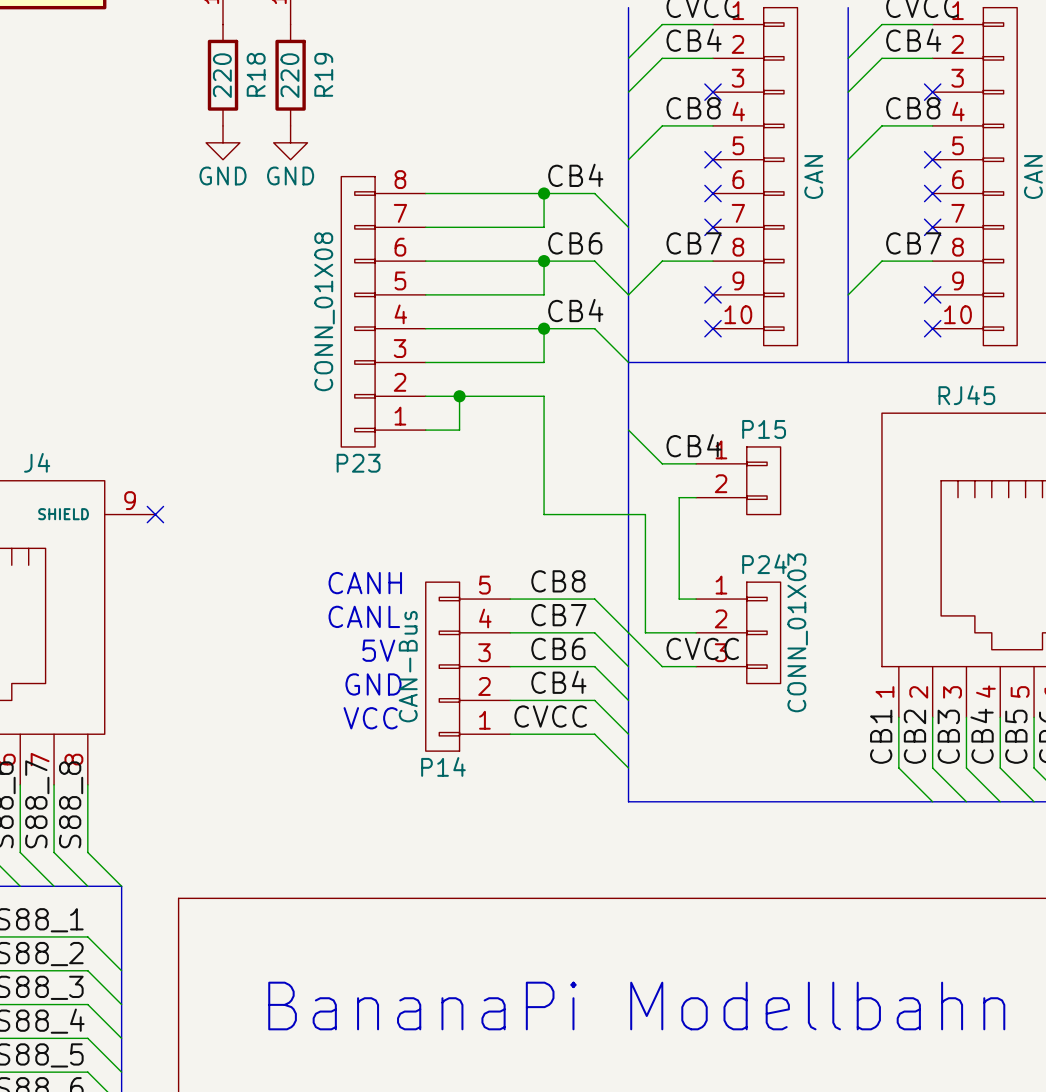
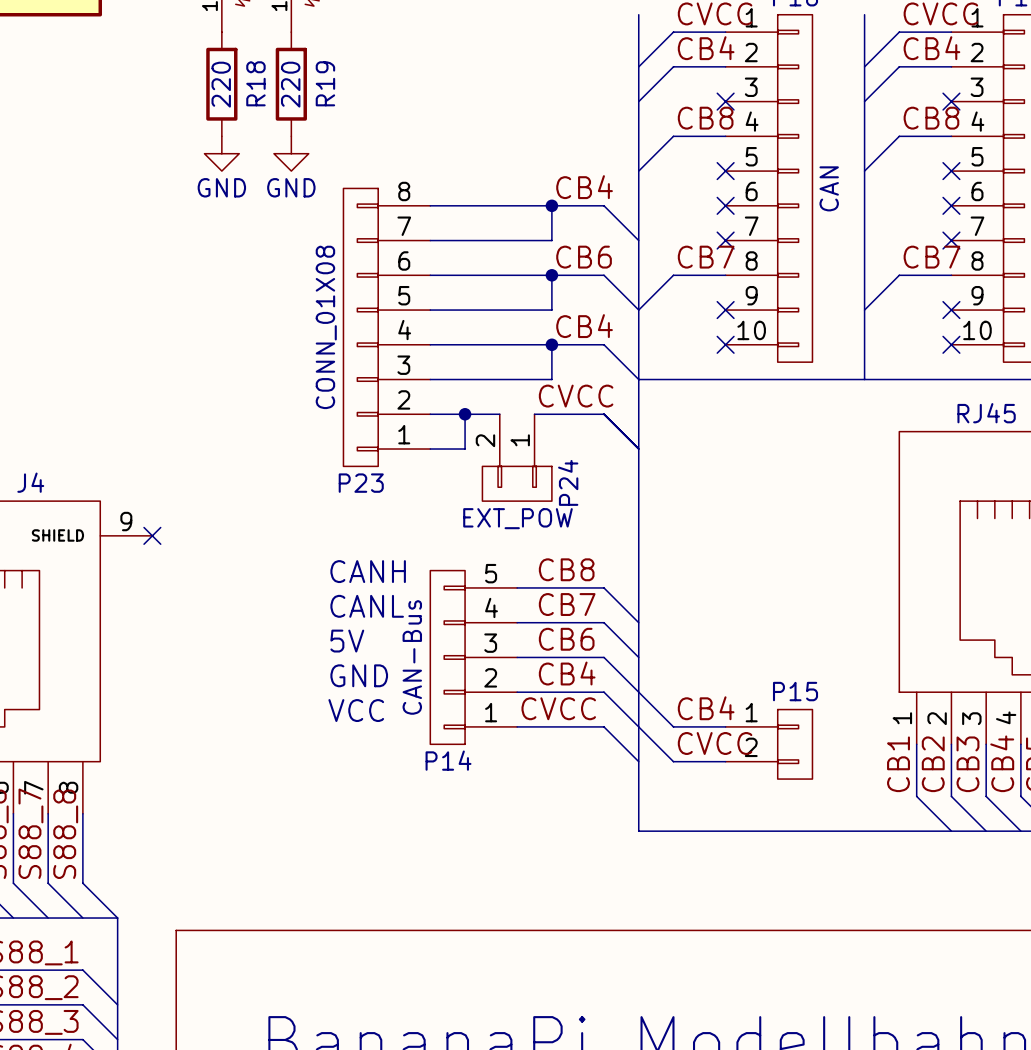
label: none -> CVCC (576, 396)
wire: (493, 396) (527, 396) -> none
wire: (544, 396) (544, 514) (645, 514) (645, 632) (696, 632) -> none
wire: (628, 430) (662, 463) (696, 463) -> (638, 449) (604, 414) (551, 414)
label: CB4 (694, 445) -> none
P15 position: (738, 480) -> (769, 744)
wire: (696, 497) (679, 497) (679, 599) (696, 599) -> none
label: none -> CB8 (566, 569)
text: none -> CANH (368, 571)
P24 name position: P24 (764, 564) -> P24 (568, 482)
label: CB8 (558, 581) -> CB7 (567, 604)
P24 symbol: [696, 582, 781, 684] -> [482, 414, 552, 502]
text: CANH (365, 583) -> CANL (367, 606)
label: CB7 (558, 615) -> CB6 (566, 639)
text: CANL (364, 616) -> 5V (347, 641)
wire: (628, 632) (662, 666) (696, 666) -> none
P24 value: CONN_01X03 (797, 632) -> EXT_POW (517, 518)
label: CB6 (558, 648) -> CB4 (567, 673)
label position: CVCC (702, 648) -> CVCC (715, 743)
text: 5V (378, 650) -> none
P14 position: (468, 666) -> (473, 657)
wire: none -> (638, 692) (673, 726) (725, 726)
label: CB4 (558, 682) -> none
label: none -> CB4 (706, 708)
text position: GND (373, 684) -> GND (359, 675)
wire: none -> (638, 726) (673, 761) (725, 761)
label position: CVCC (550, 716) -> CVCC (558, 708)
text position: VCC (370, 718) -> VCC (356, 710)
wire: (510, 734) (594, 734) (628, 768) -> (517, 587) (604, 587) (638, 622)

